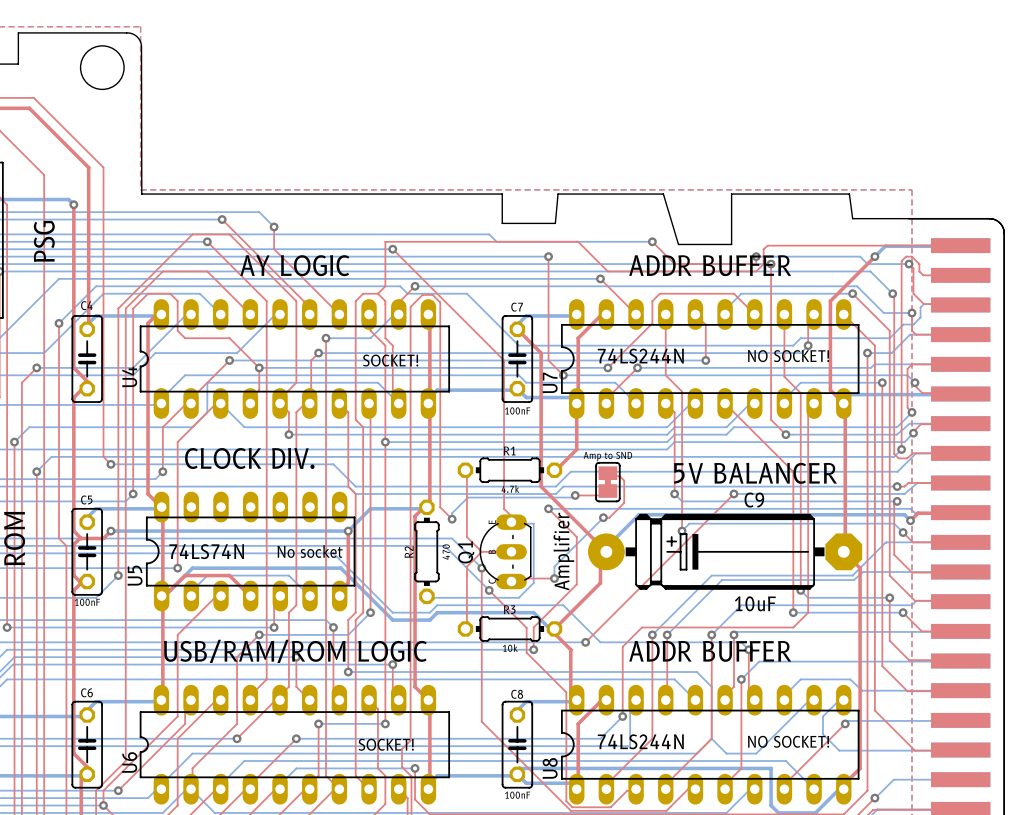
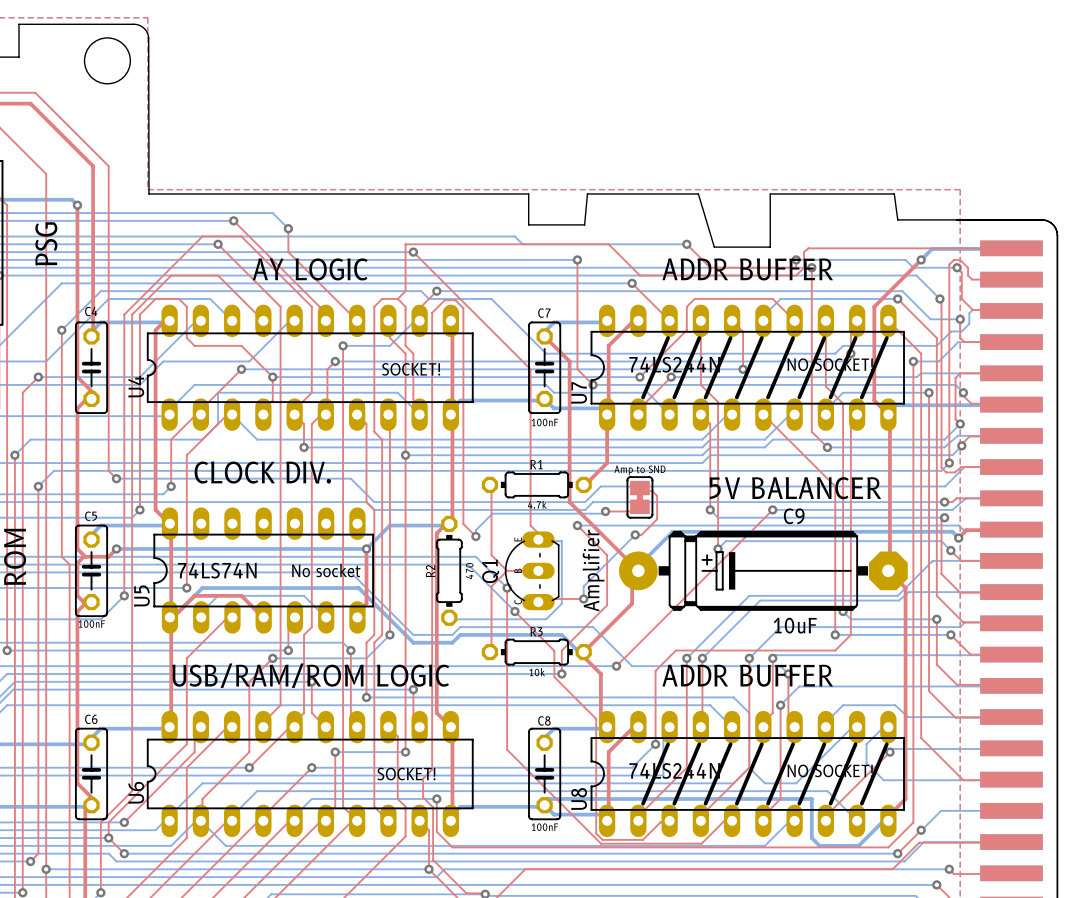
line: none -> (668, 338) (643, 397)
line: none -> (699, 338) (674, 397)
line: none -> (730, 338) (705, 397)
line: none -> (761, 338) (736, 397)
line: none -> (793, 338) (768, 397)
line: none -> (824, 338) (799, 397)
line: none -> (855, 338) (830, 397)
line: none -> (886, 338) (861, 397)
line: none -> (668, 744) (643, 803)
line: none -> (699, 744) (674, 803)
line: none -> (730, 744) (705, 803)
line: none -> (761, 744) (736, 803)
line: none -> (793, 744) (768, 803)
line: none -> (824, 744) (799, 803)
line: none -> (855, 744) (830, 803)
line: none -> (886, 744) (861, 803)

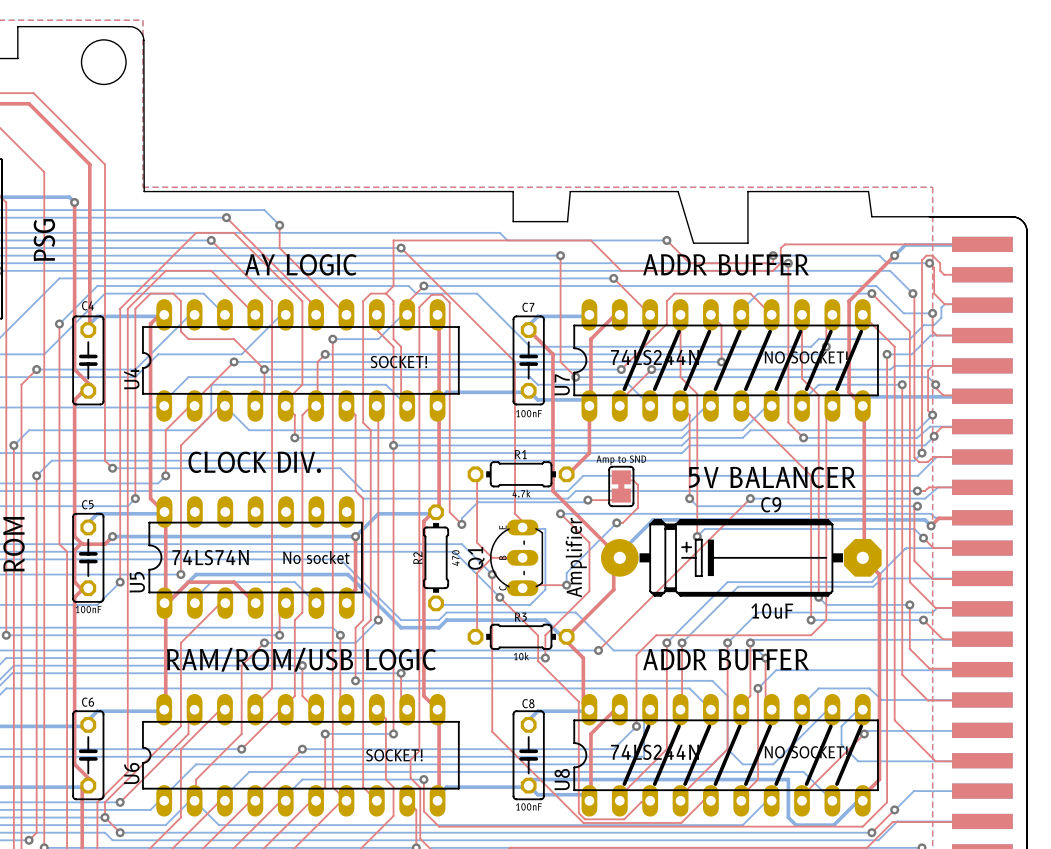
text: USB/RAM/ROM LOGIC (310, 675) -> RAM/ROM/USB LOGIC (301, 659)

